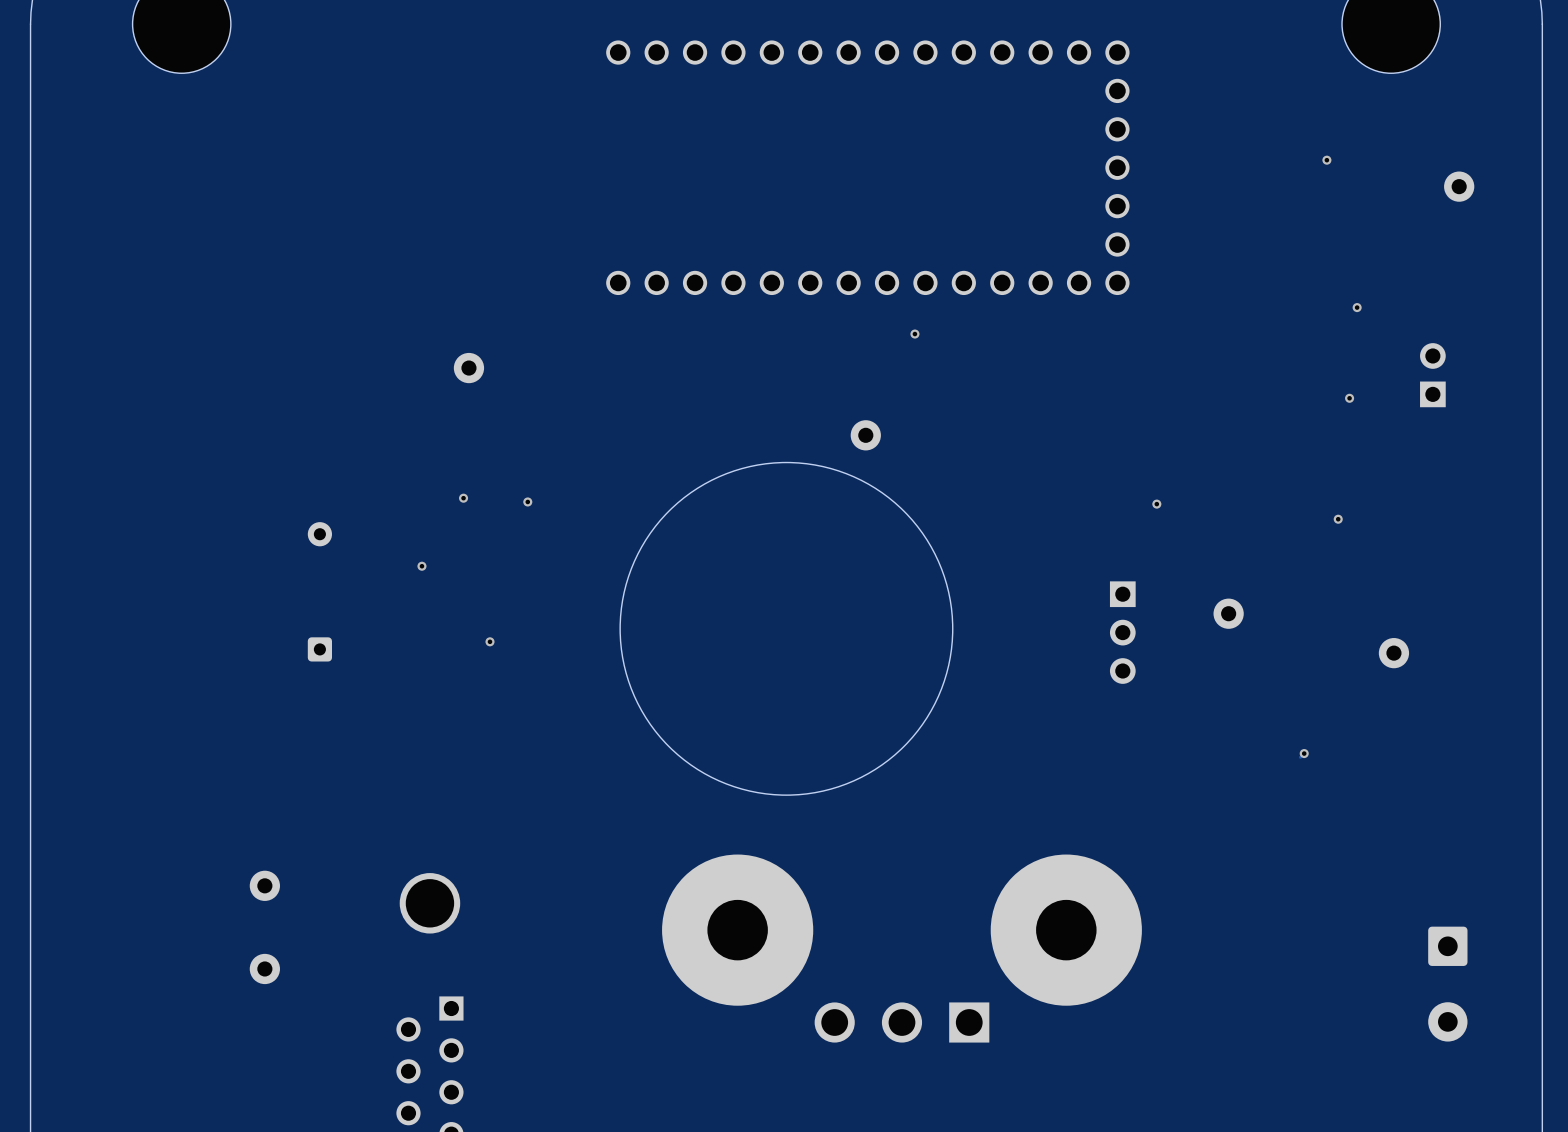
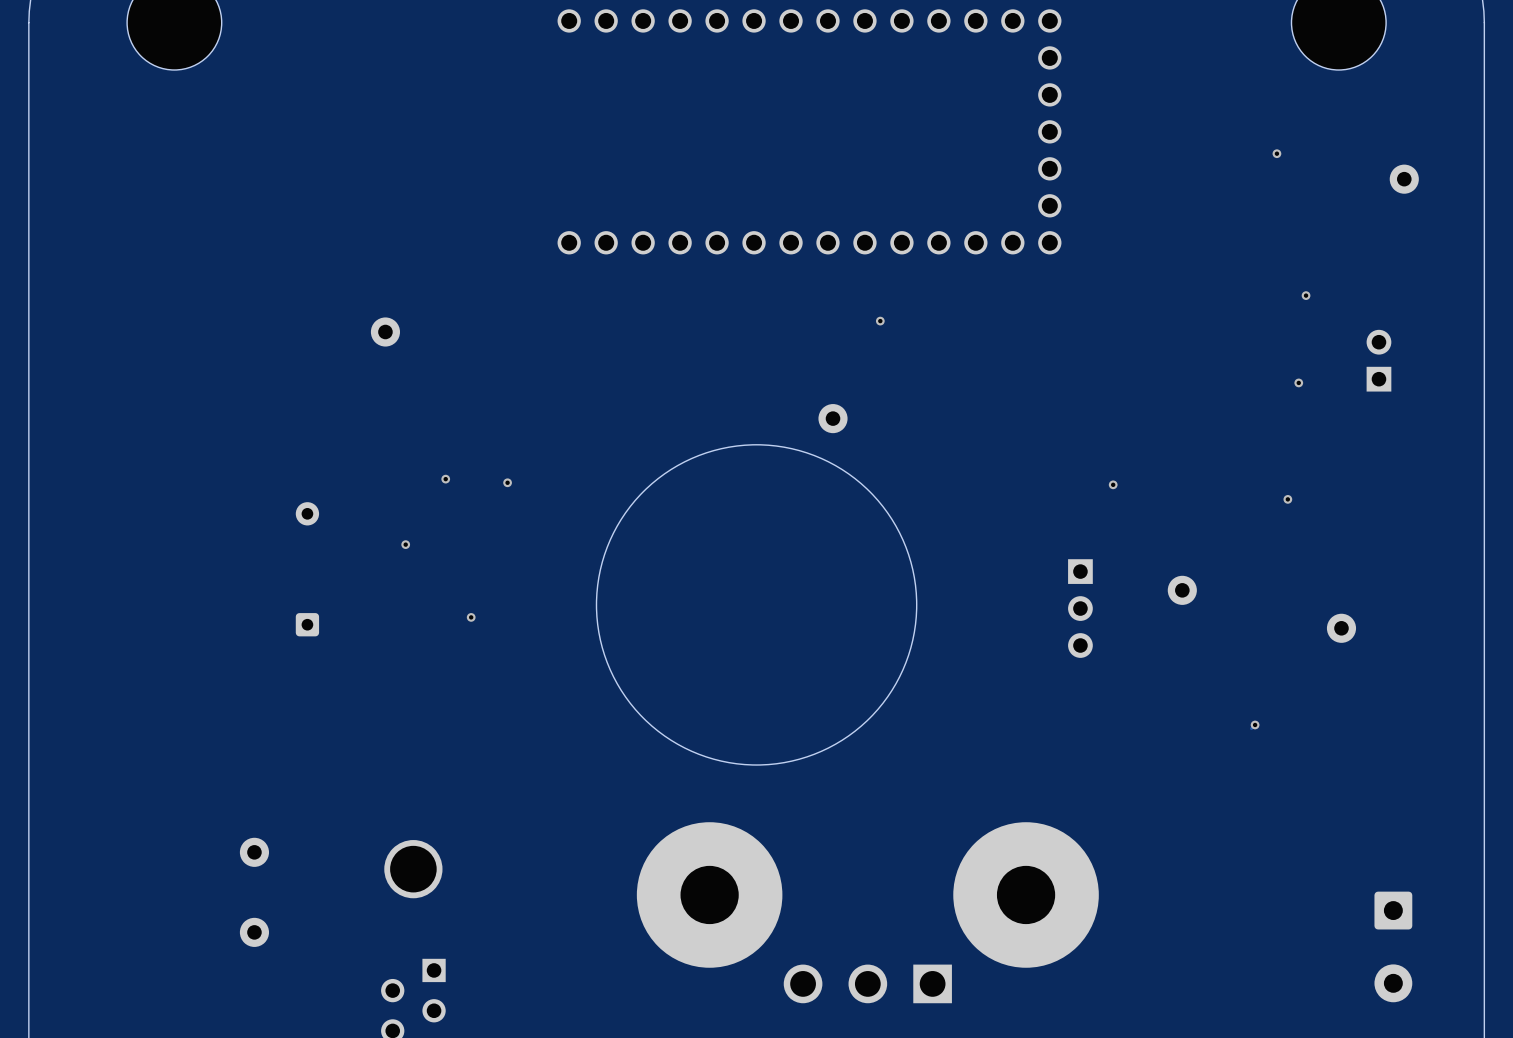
part position: (867, 167) -> (809, 131)
part position: (468, 368) -> (385, 332)

